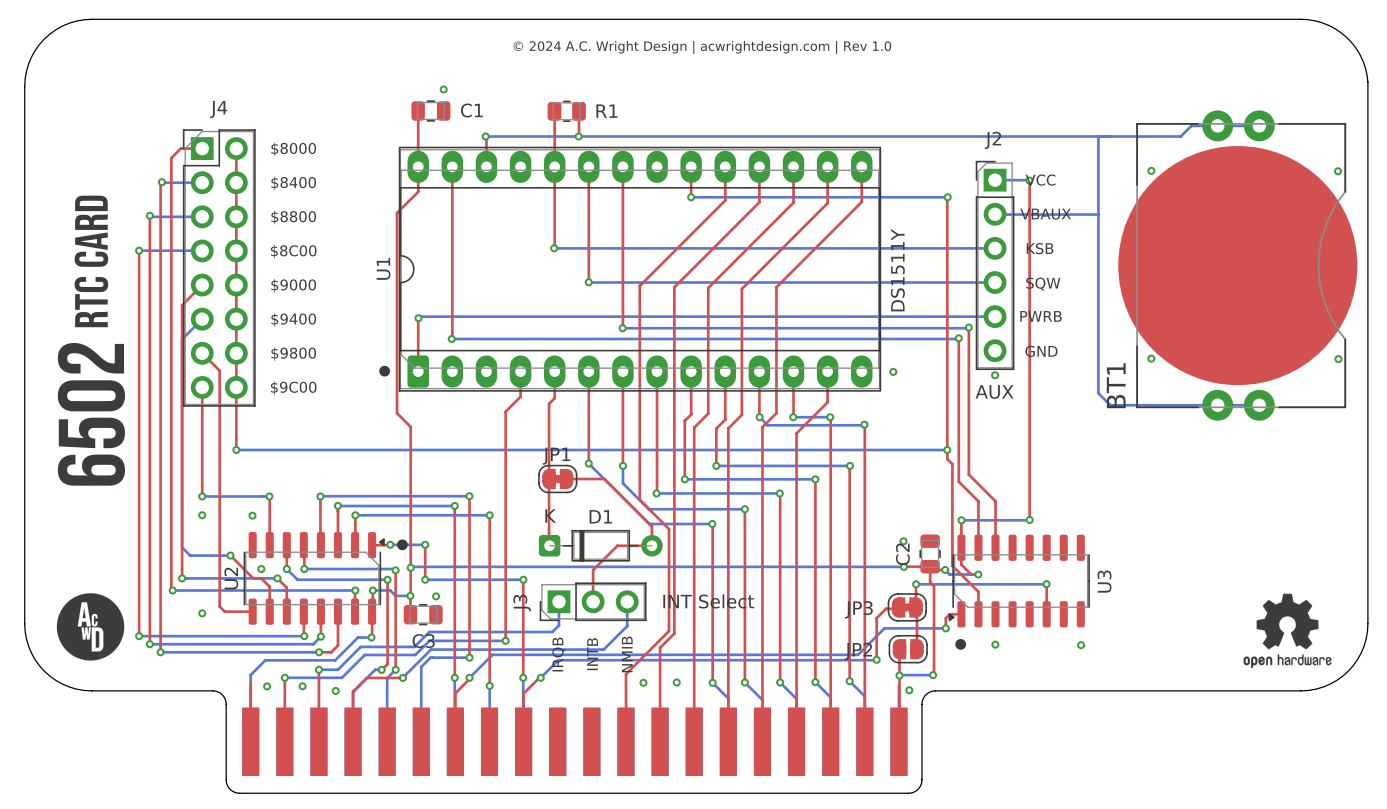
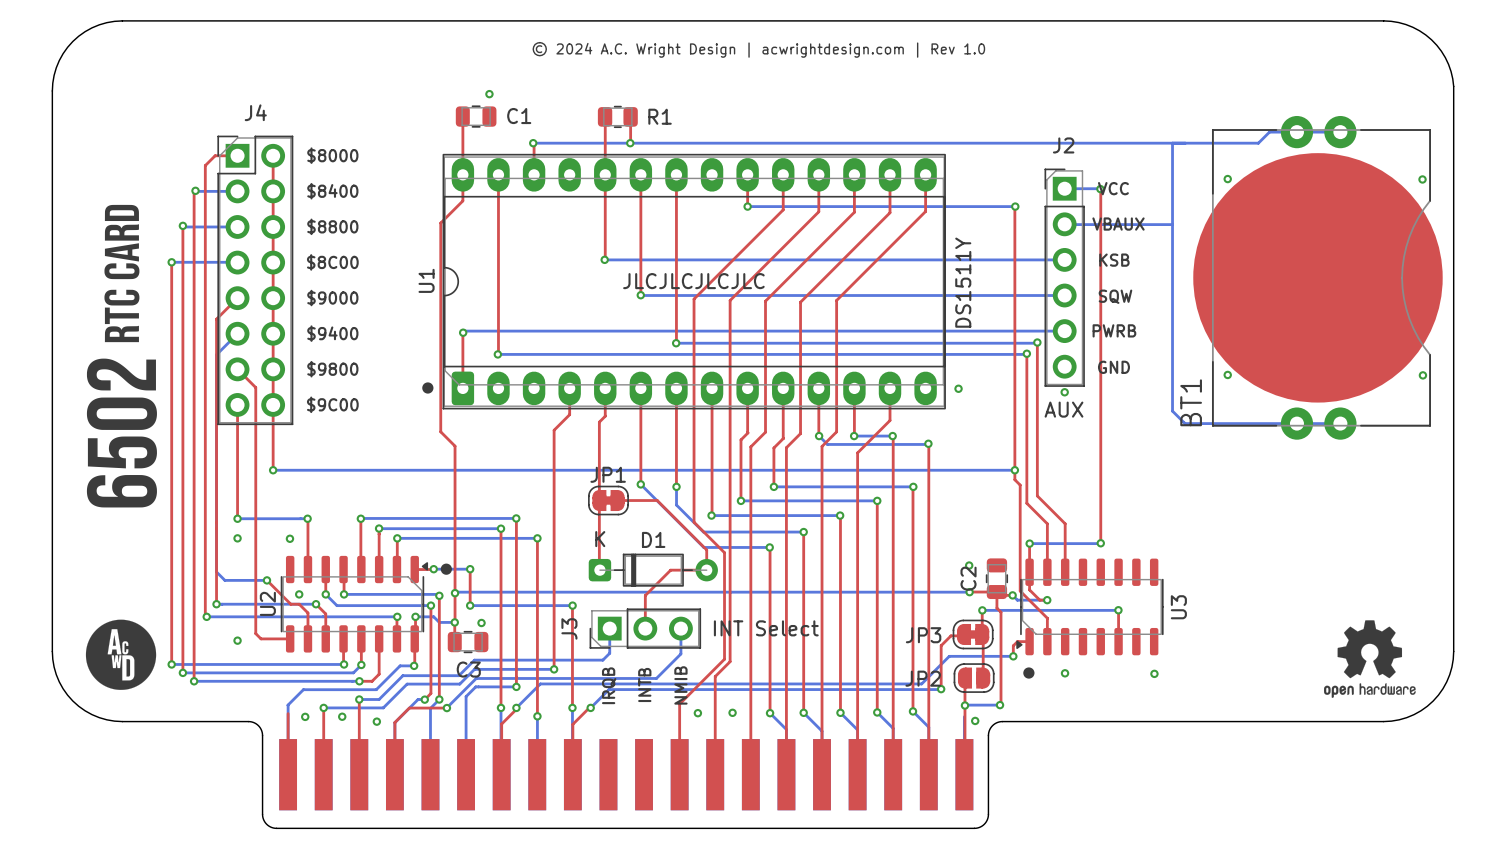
text: none -> JLCJLCJLCJLC (693, 281)

